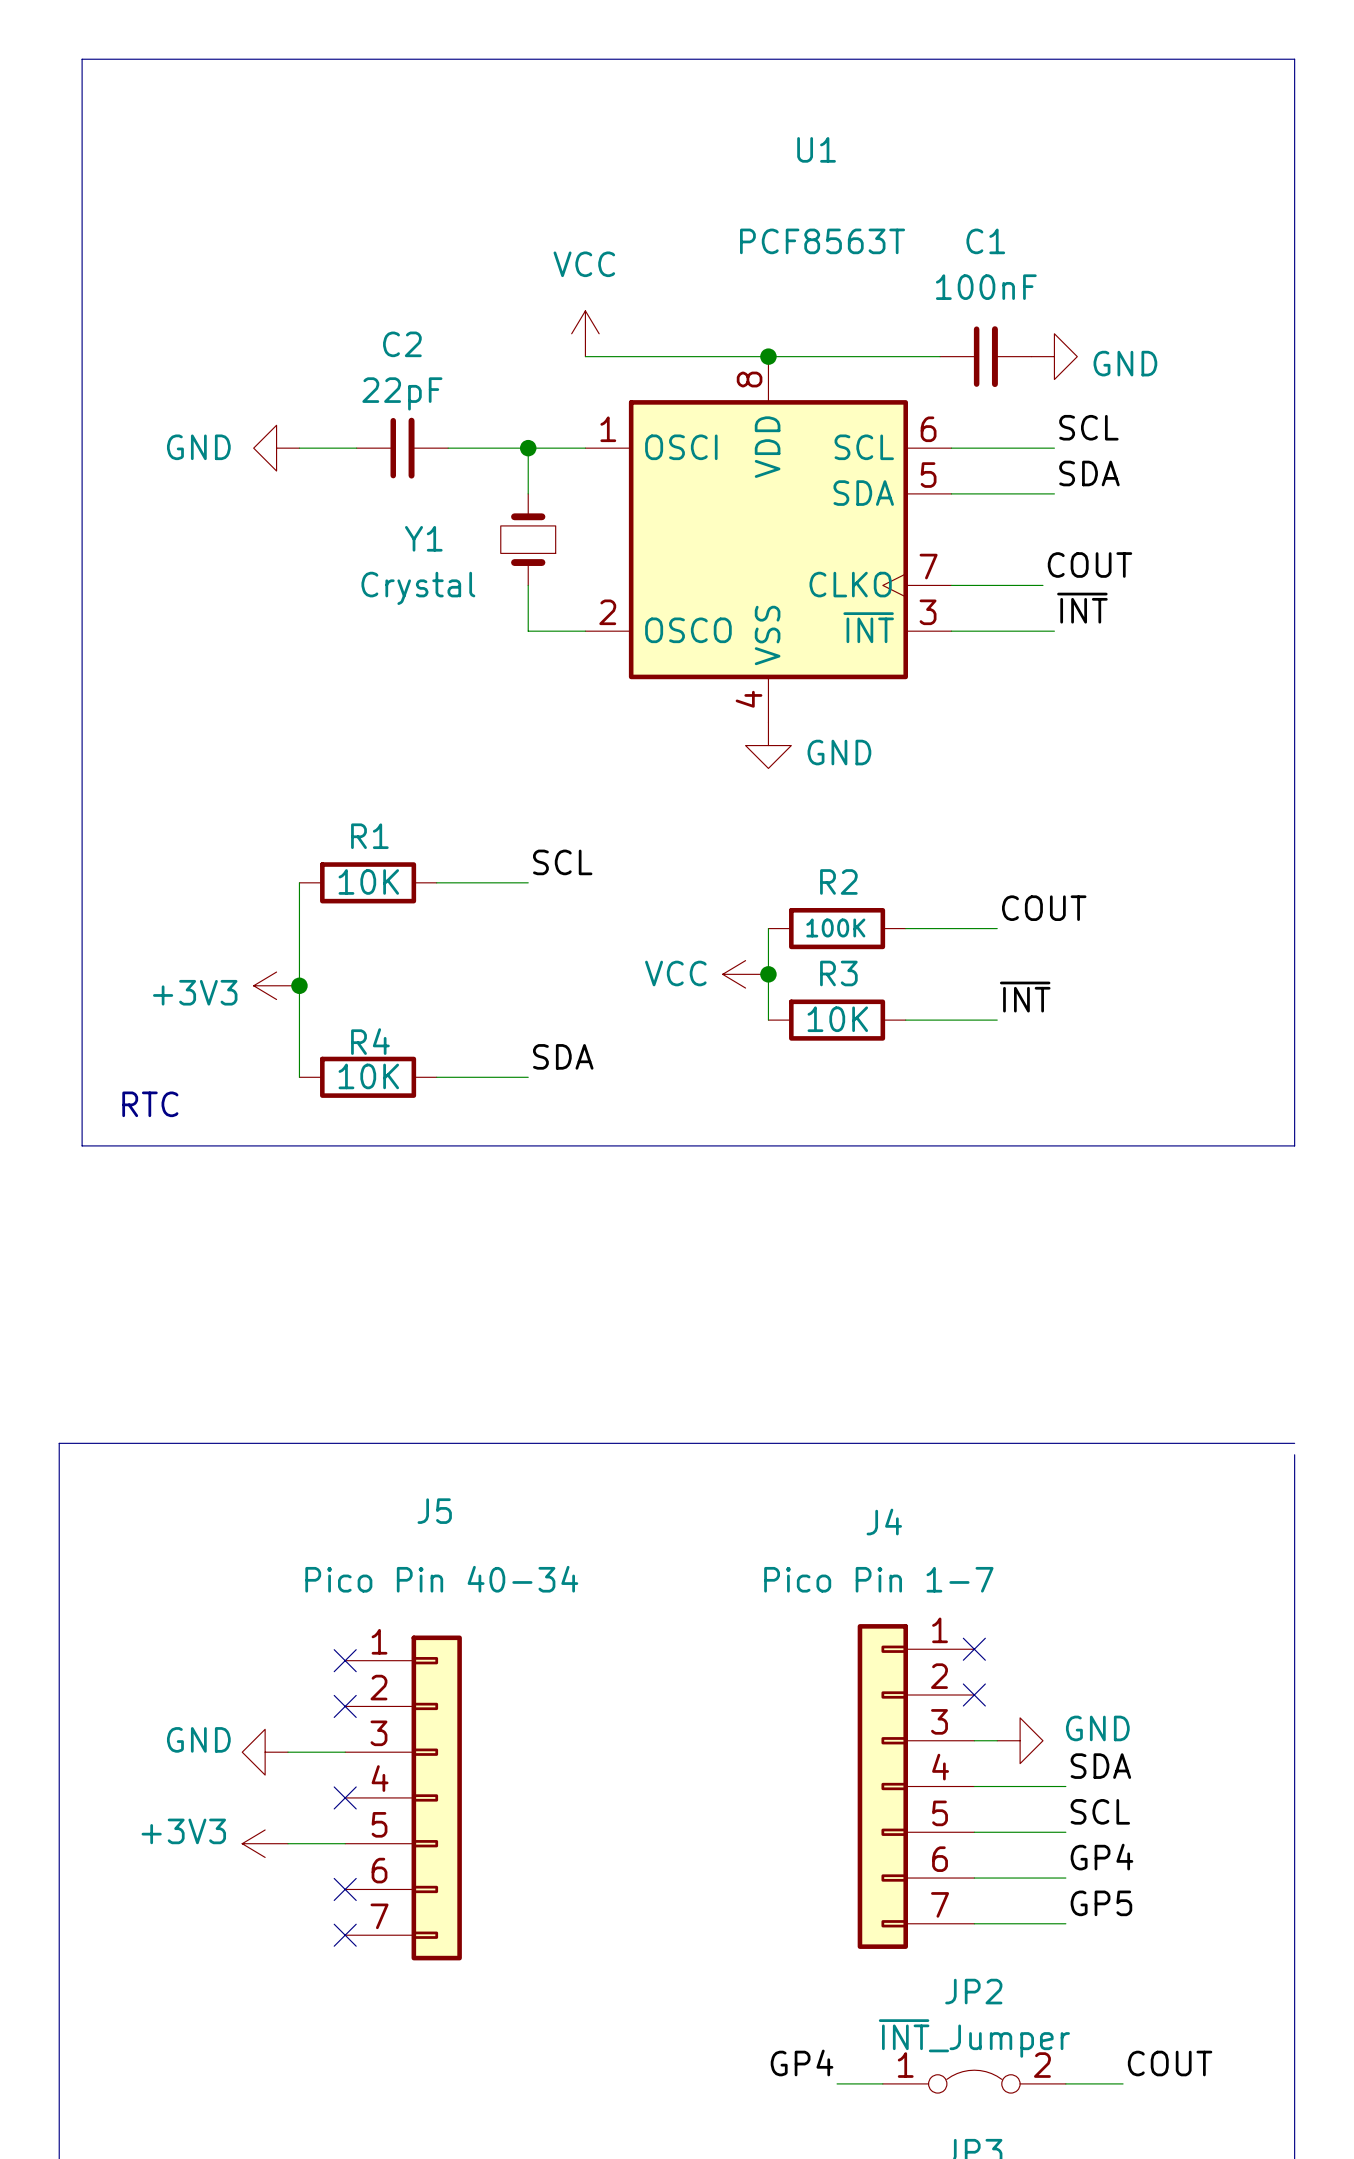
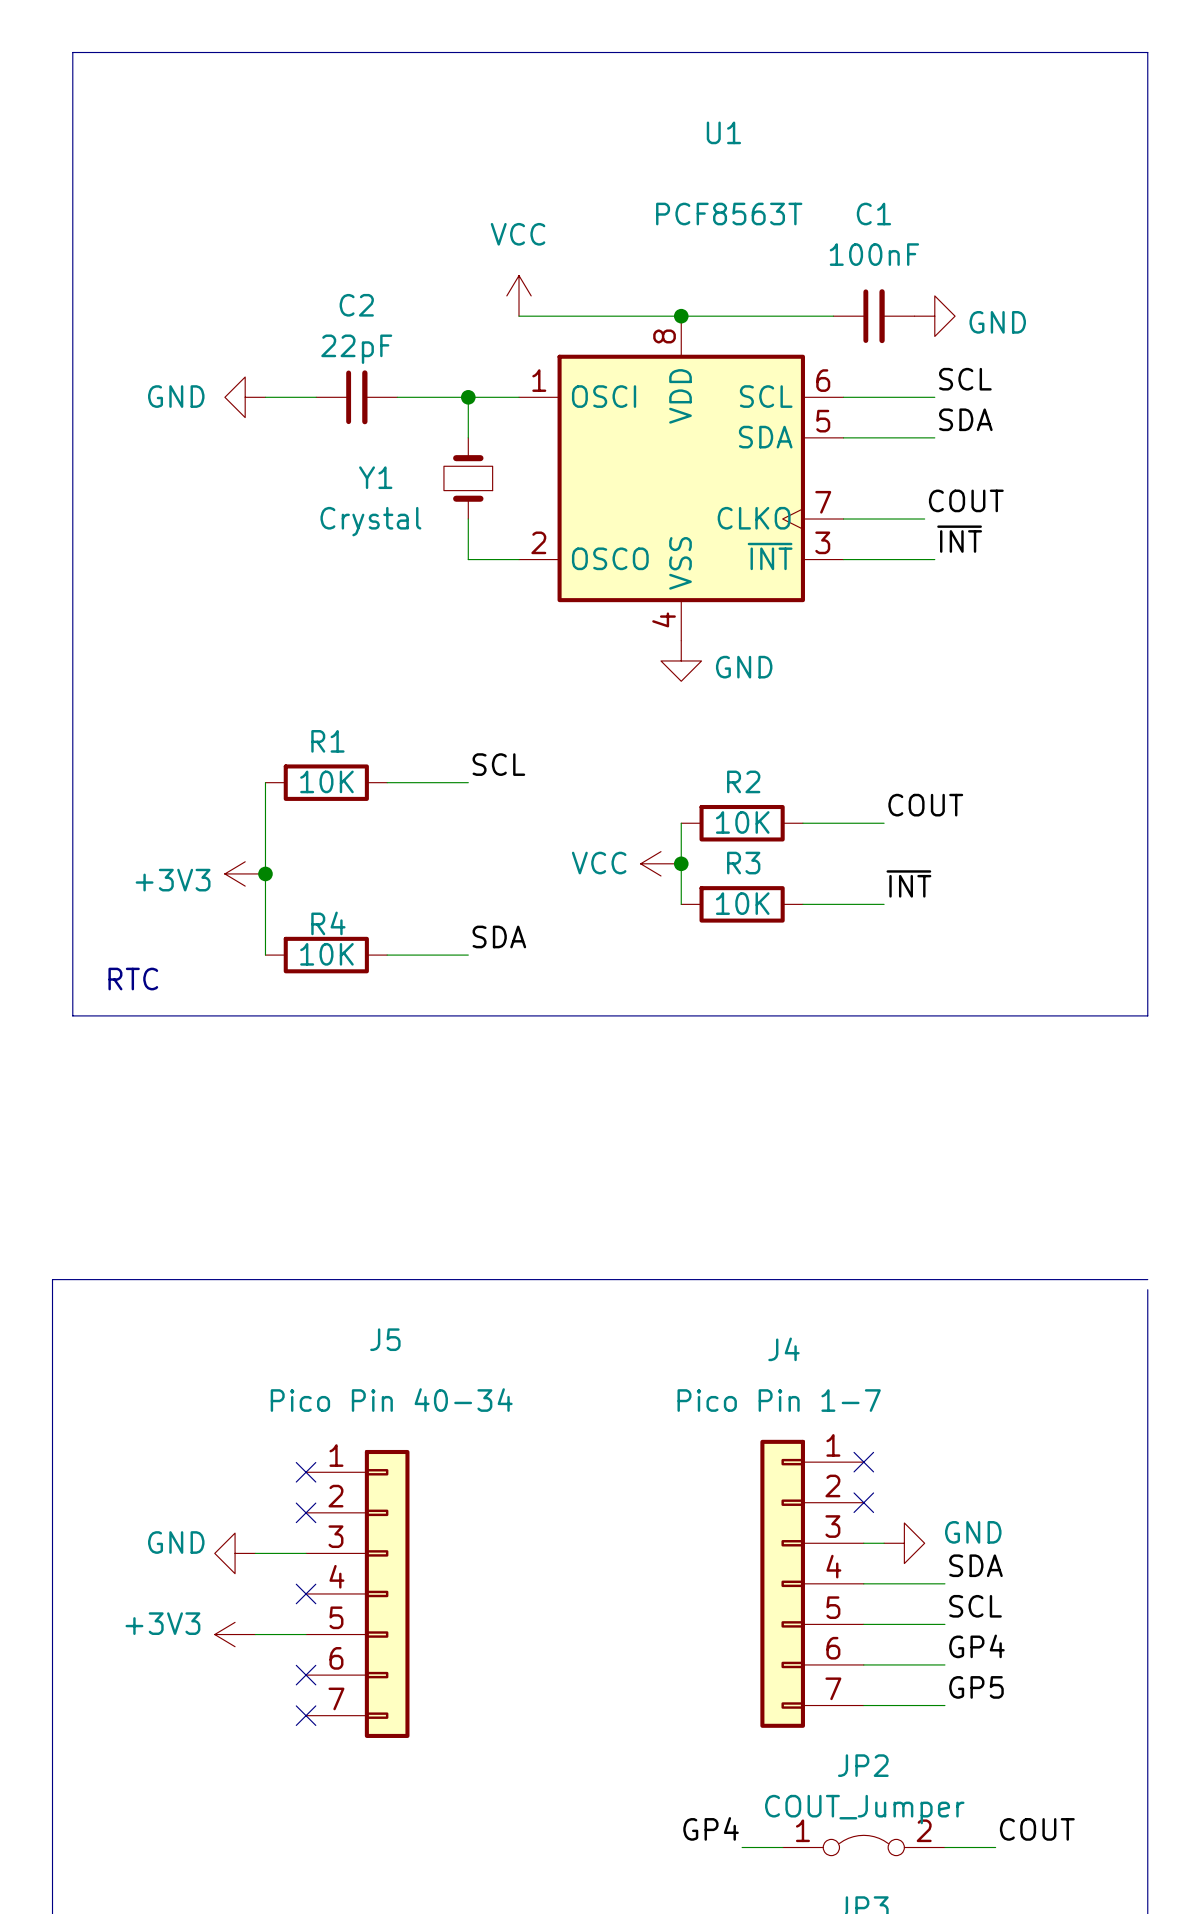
R2 value: 100K (835, 927) -> 10K (742, 822)
JP2 value: ~{INT}_Jumper (974, 2038) -> COUT_Jumper (864, 1809)

